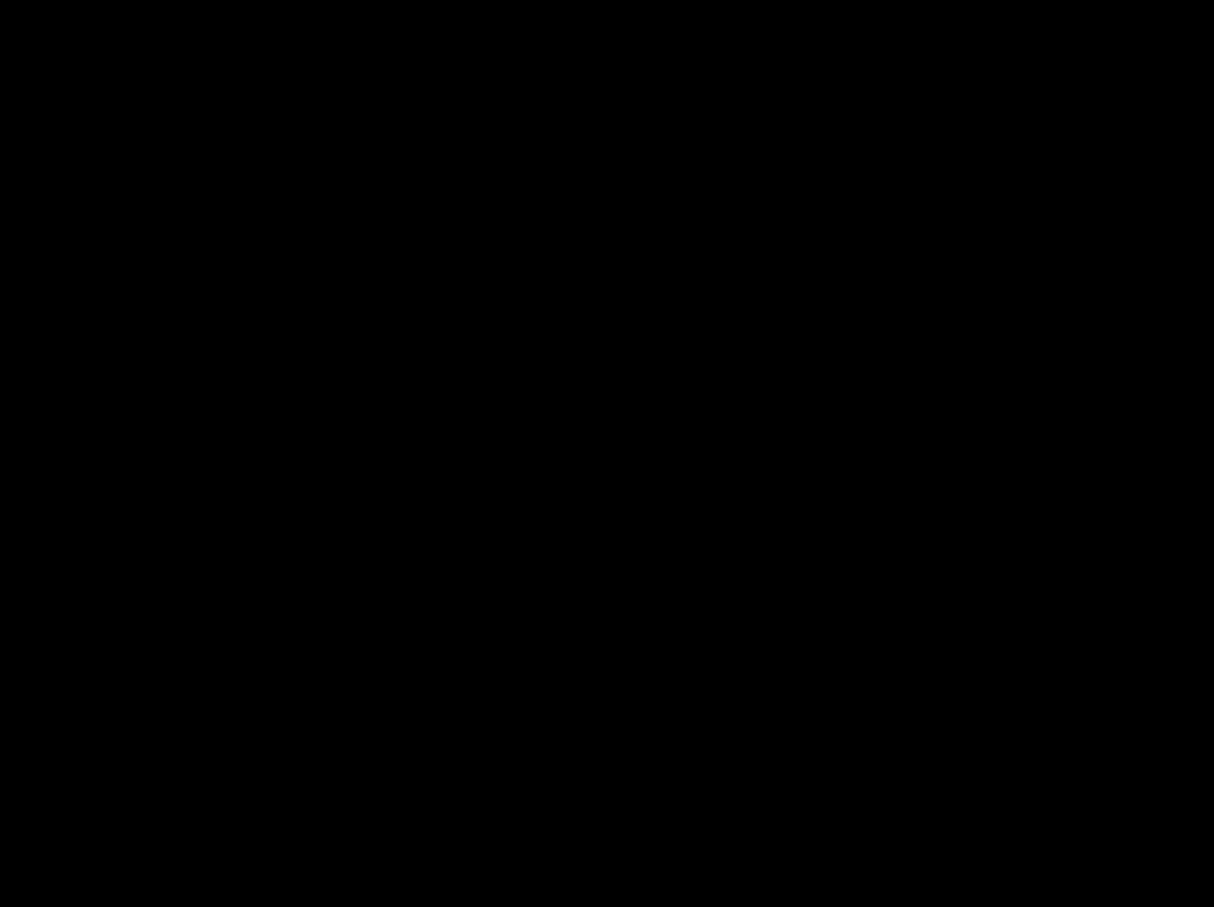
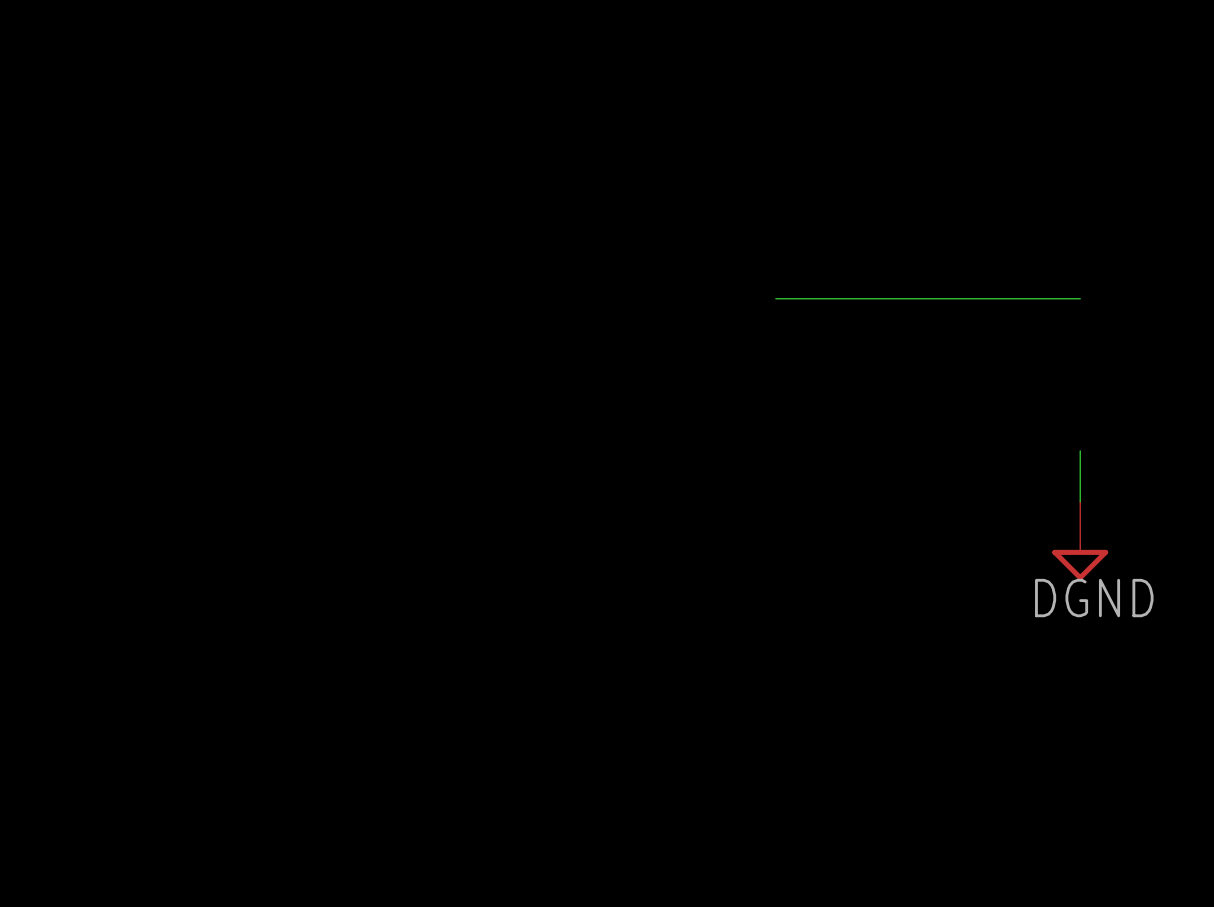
wire: none -> (775, 298) (1080, 298)
wire: none -> (1080, 450) (1080, 501)
power symbol: none -> DGND (1080, 540)

